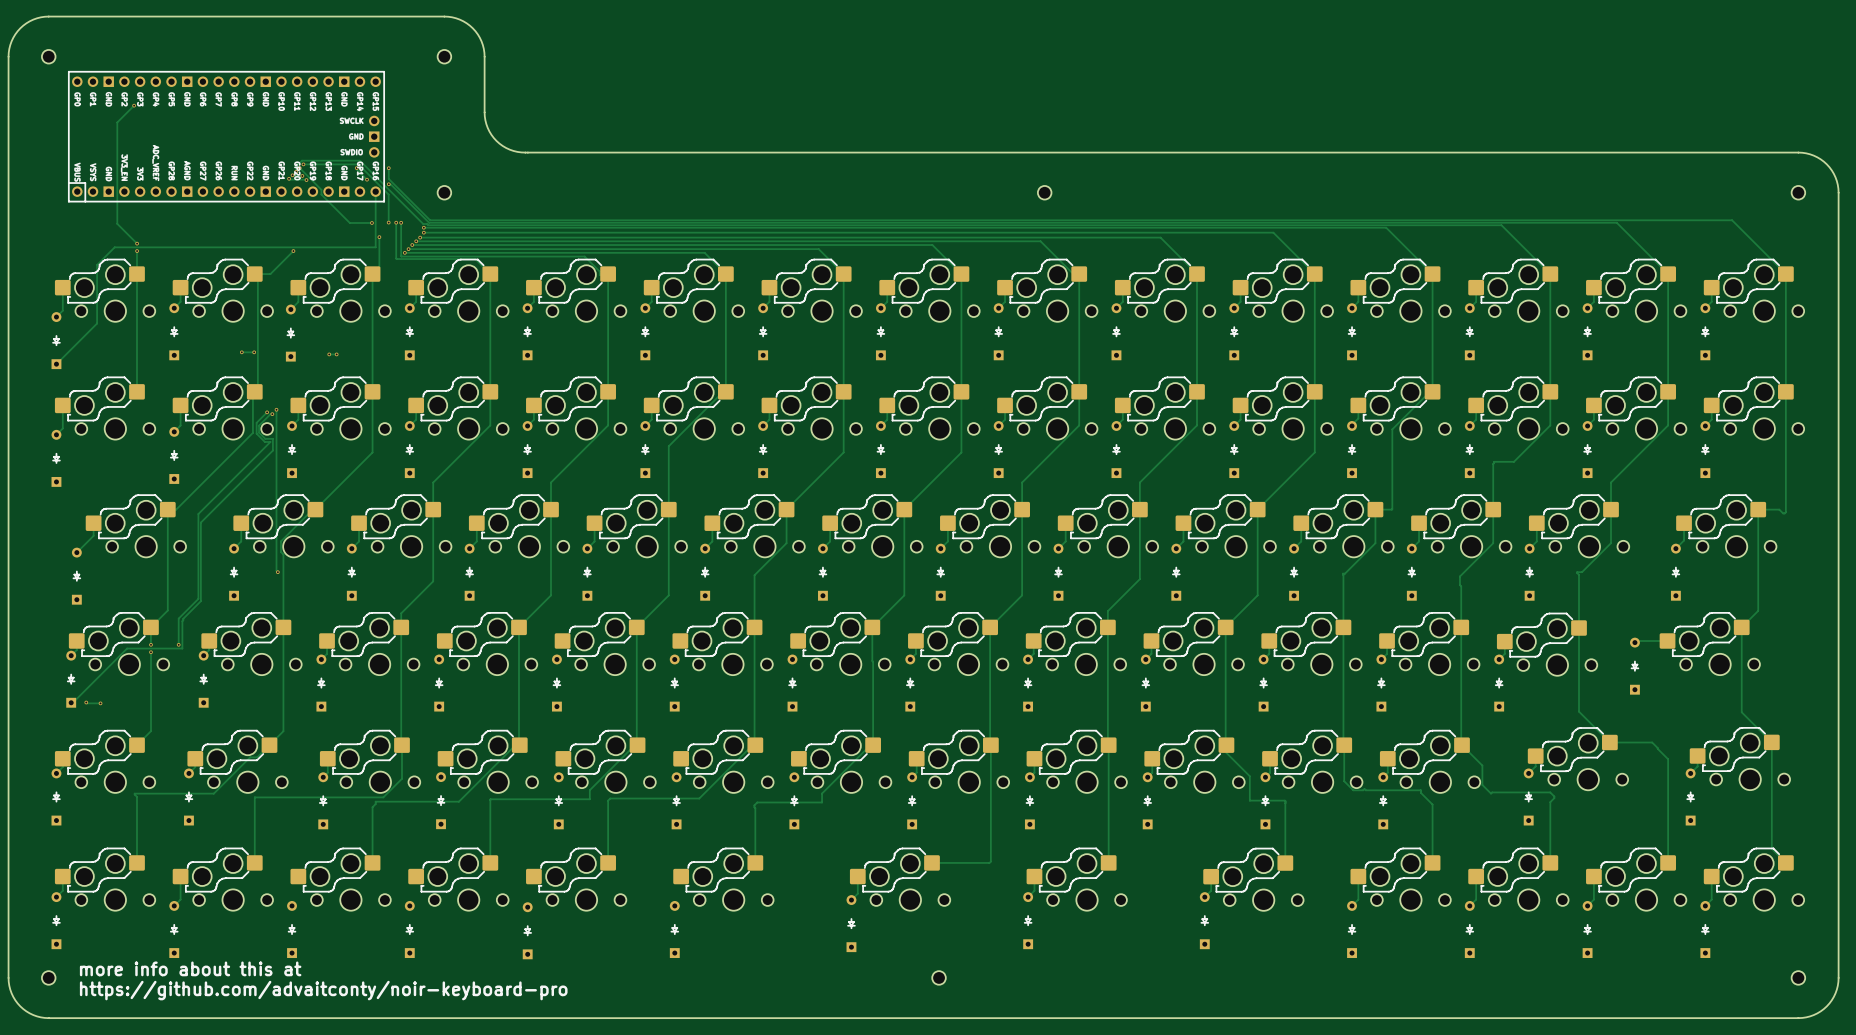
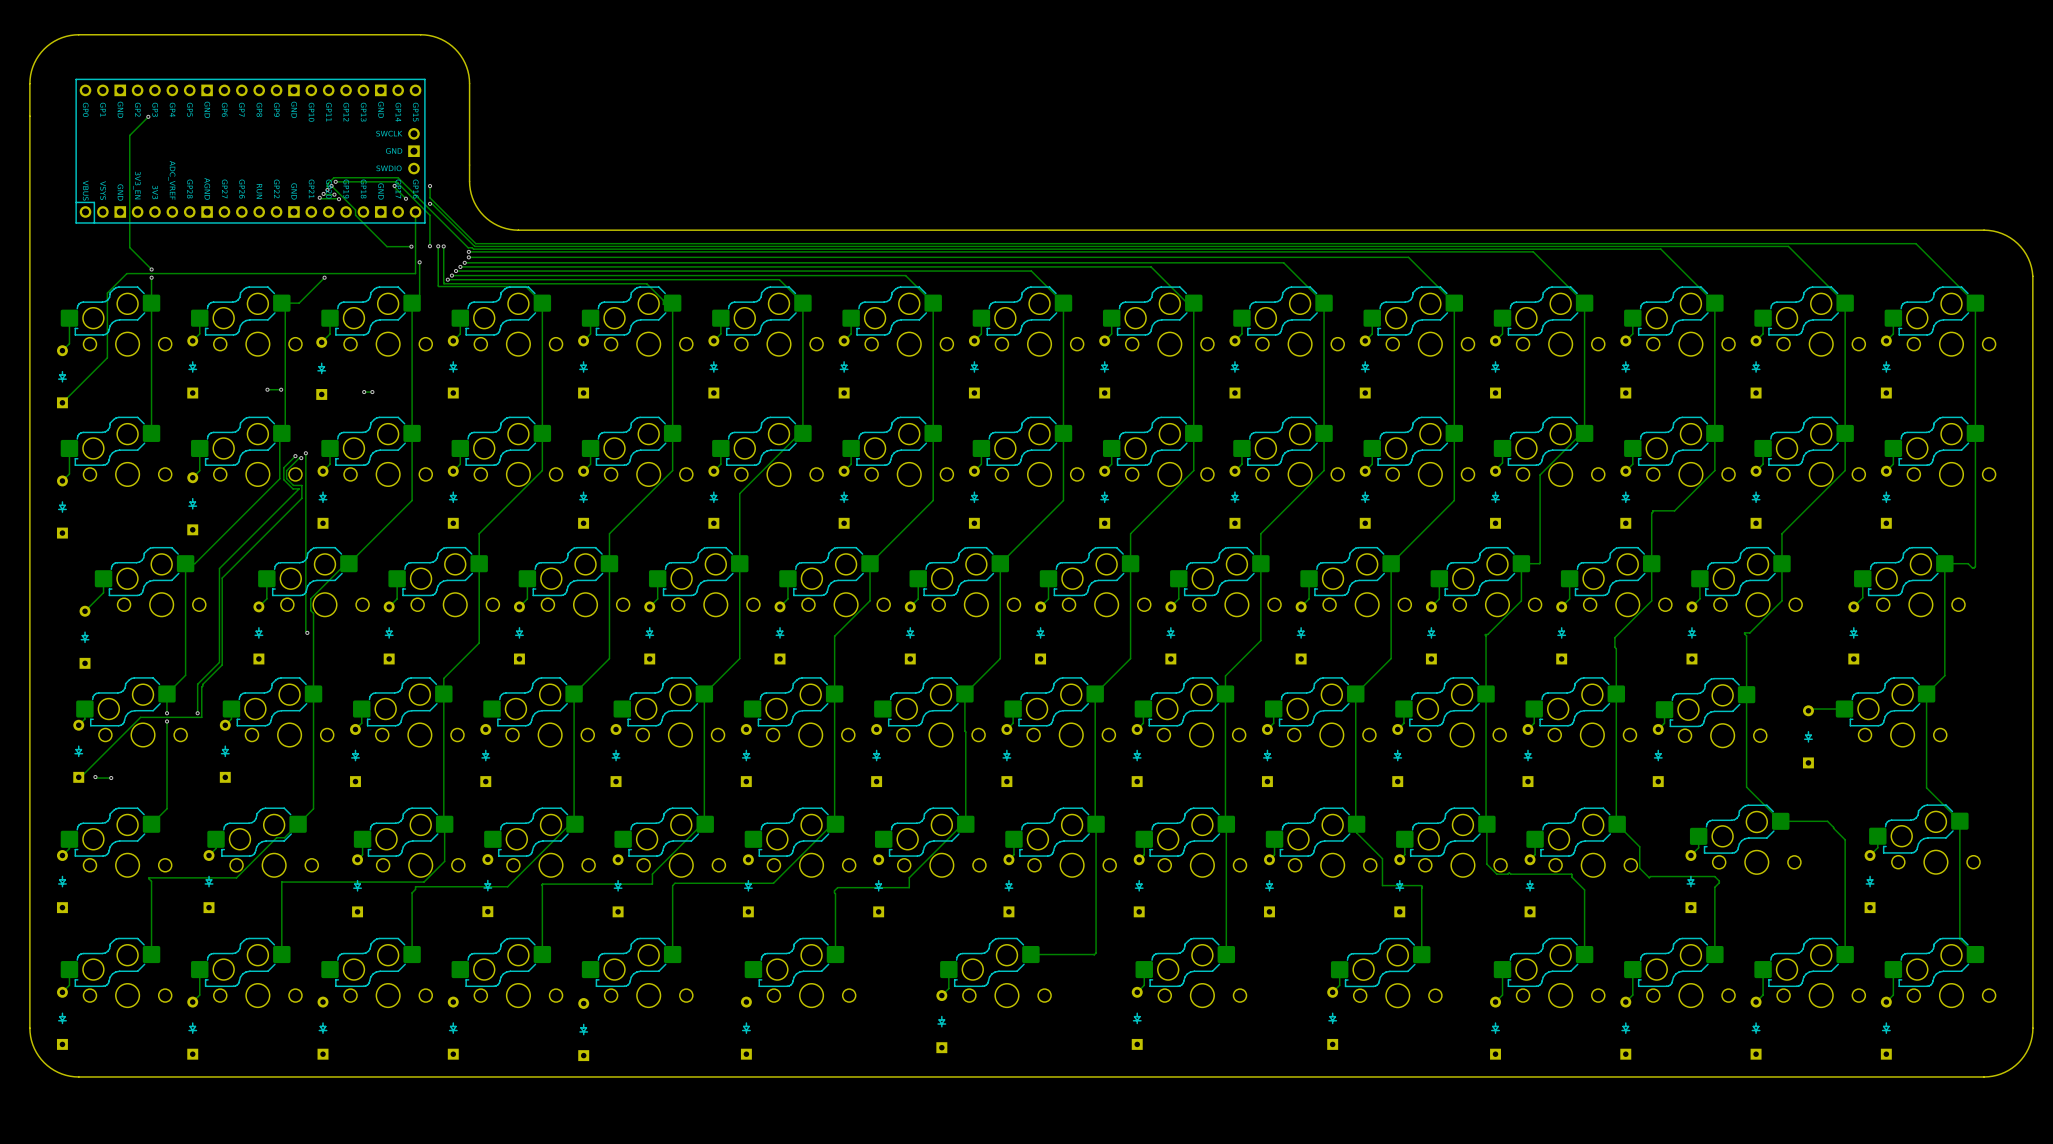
board edge: (444, 16) (44, 16) (26, 23) (17, 31) (11, 41) (8, 56) (8, 977) (13, 996) (26, 1011) (37, 1016) (48, 1018) (1798, 1018) (1817, 1013) (1831, 1000) (1836, 989) (1838, 977) (1838, 192) (1833, 173) (1820, 159) (1810, 154) (1798, 152) (521, 152) (502, 146) (493, 138) (487, 127) (484, 112) (484, 52) (479, 37) (472, 28) (463, 21) (444, 16) -> (420, 34) (437, 37) (448, 43) (458, 52) (465, 62) (469, 79) (471, 193) (478, 209) (487, 218) (497, 225) (514, 229) (1984, 230) (1997, 232) (2010, 237) (2026, 254) (2032, 276) (2032, 1028) (2031, 1040) (2026, 1052) (2018, 1062) (2008, 1070) (1996, 1075) (1984, 1076) (78, 1076) (66, 1075) (54, 1070) (44, 1062) (36, 1052) (31, 1040) (29, 1028) (29, 83) (32, 66) (38, 55) (47, 46) (62, 37) (74, 34) (420, 34)
part: (48, 56) -> none
part: (444, 56) -> none
part: (444, 192) -> none
part: (1044, 192) -> none
part: (1798, 192) -> none
text: more info about this at (190, 968) -> none
part: (48, 977) -> none
part: (939, 977) -> none
part: (1798, 977) -> none
text: https://github.com/advaitconty/noir-keyboard-pro (323, 990) -> none

